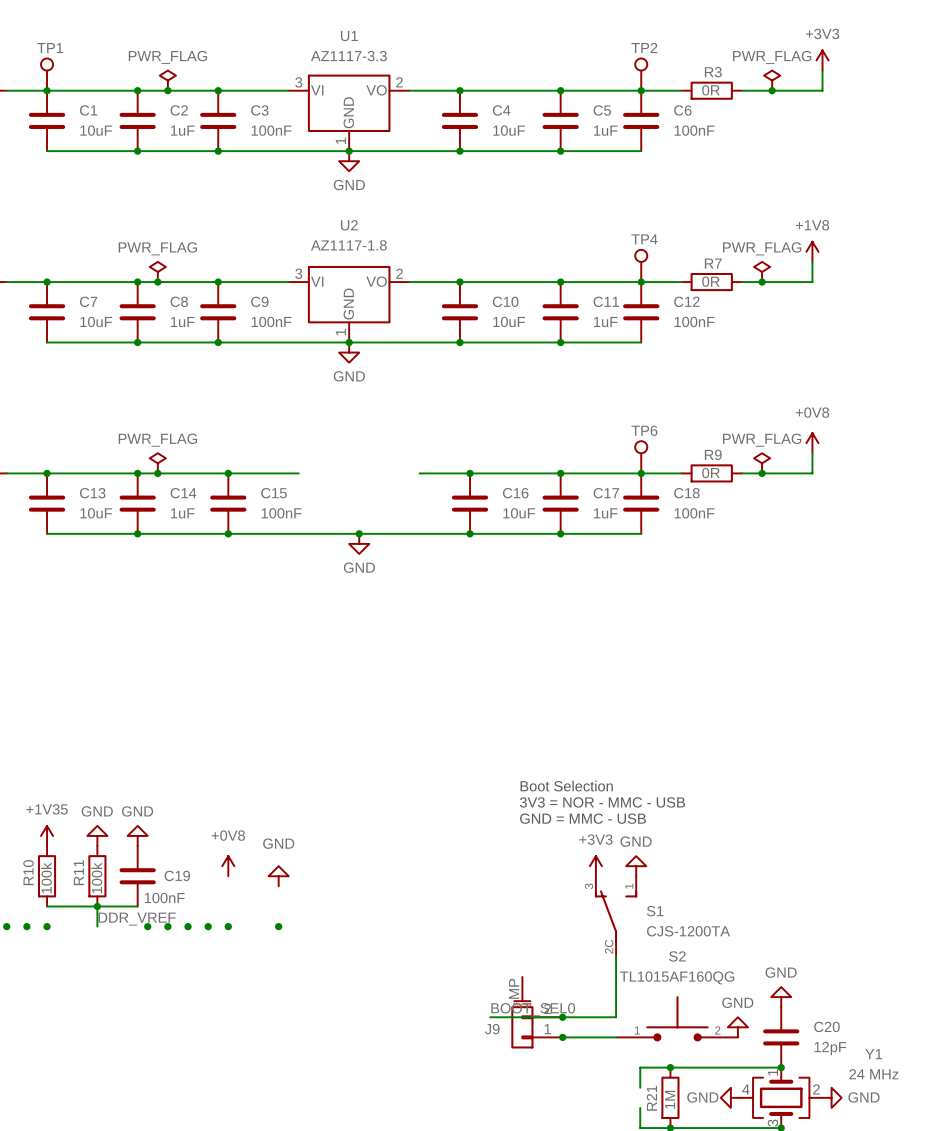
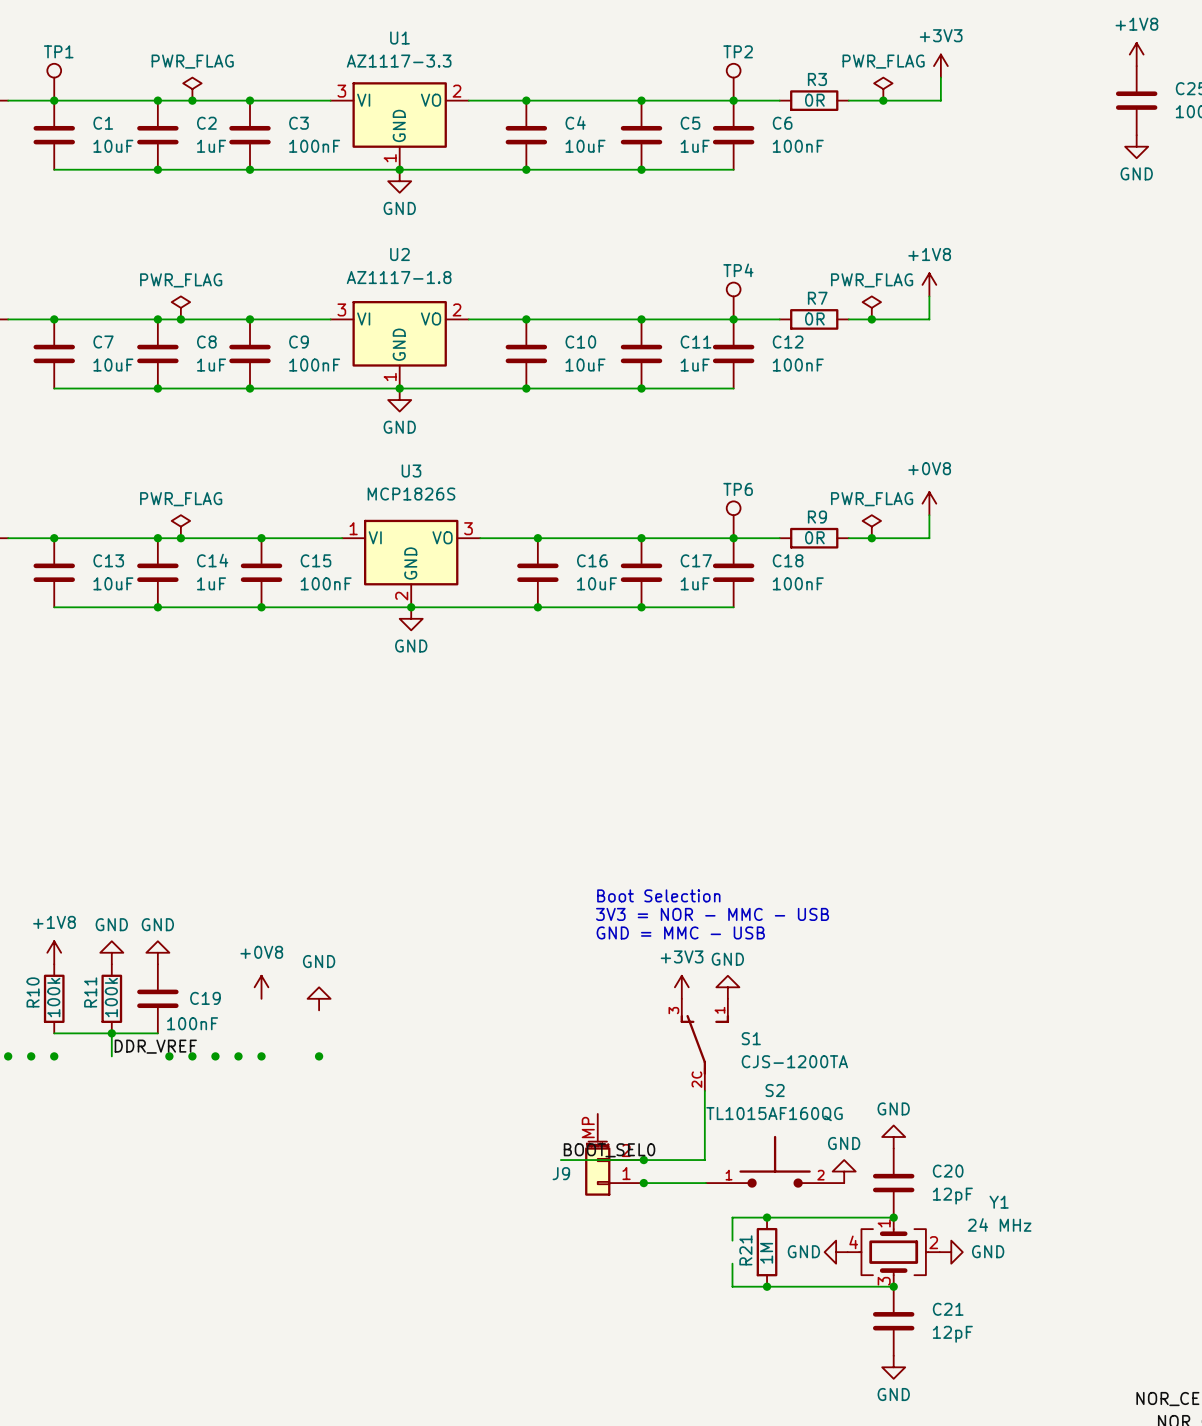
U3: none -> MCP1826S (411, 563)
power symbol: +1V35 (47, 835) -> +1V8 (54, 952)

